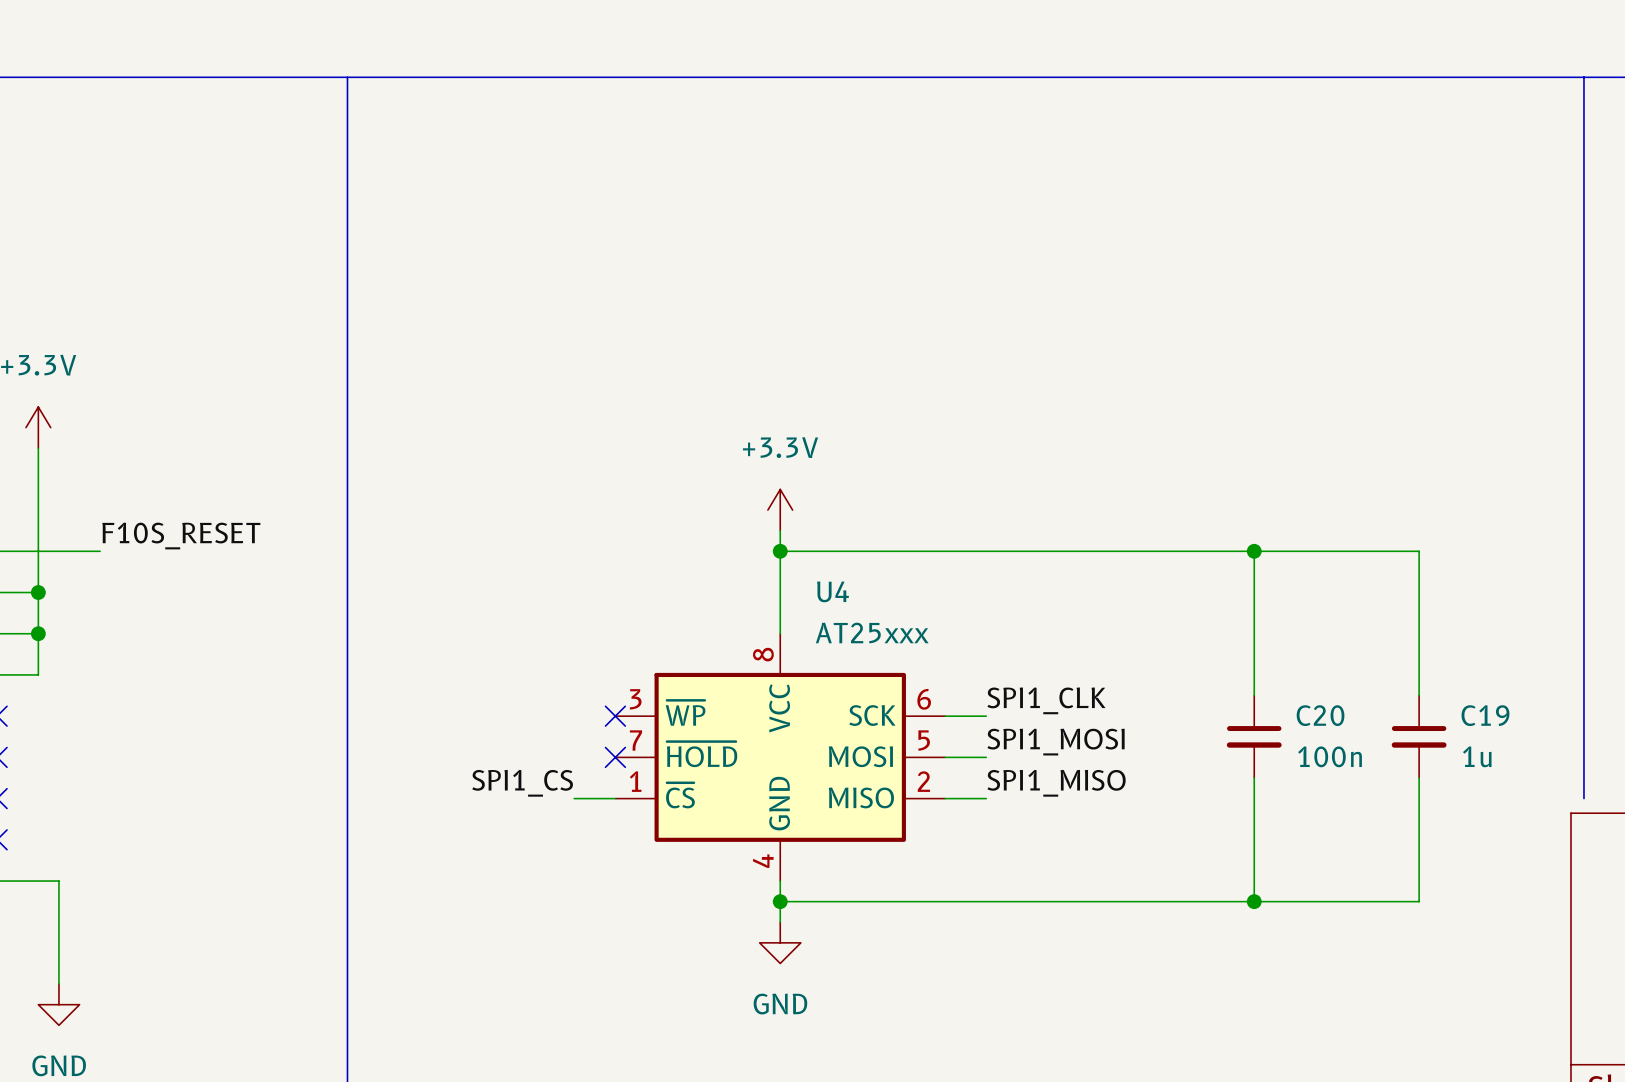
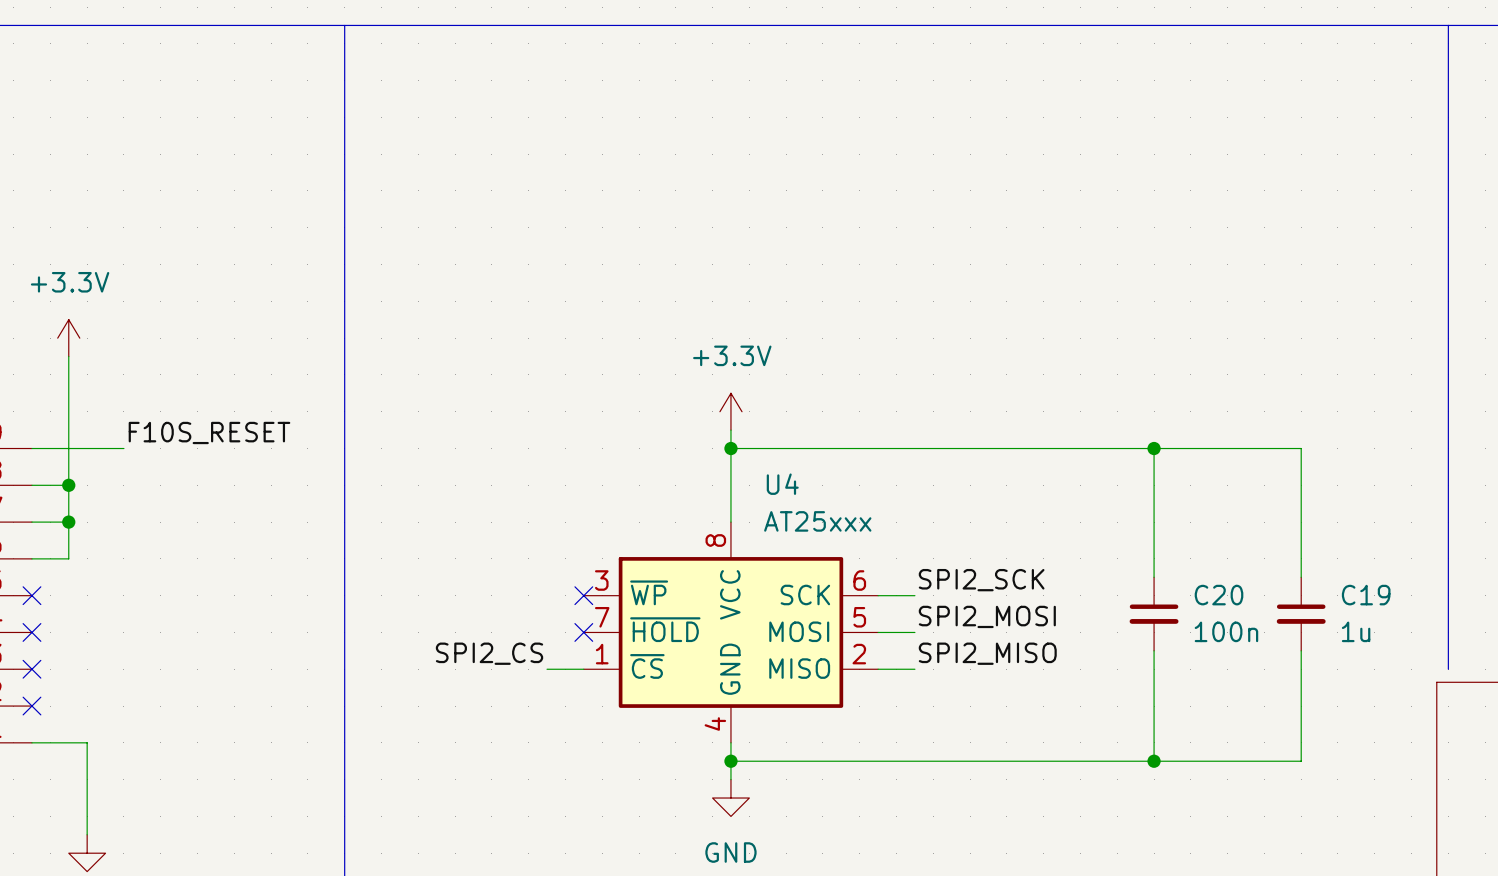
label: SPI1_CLK (1046, 700) -> SPI2_SCK (981, 580)
label: SPI1_MOSI (1056, 742) -> SPI2_MOSI (987, 616)
label: SPI1_CS (522, 783) -> SPI2_CS (489, 653)
label: SPI1_MISO (1056, 783) -> SPI2_MISO (987, 653)

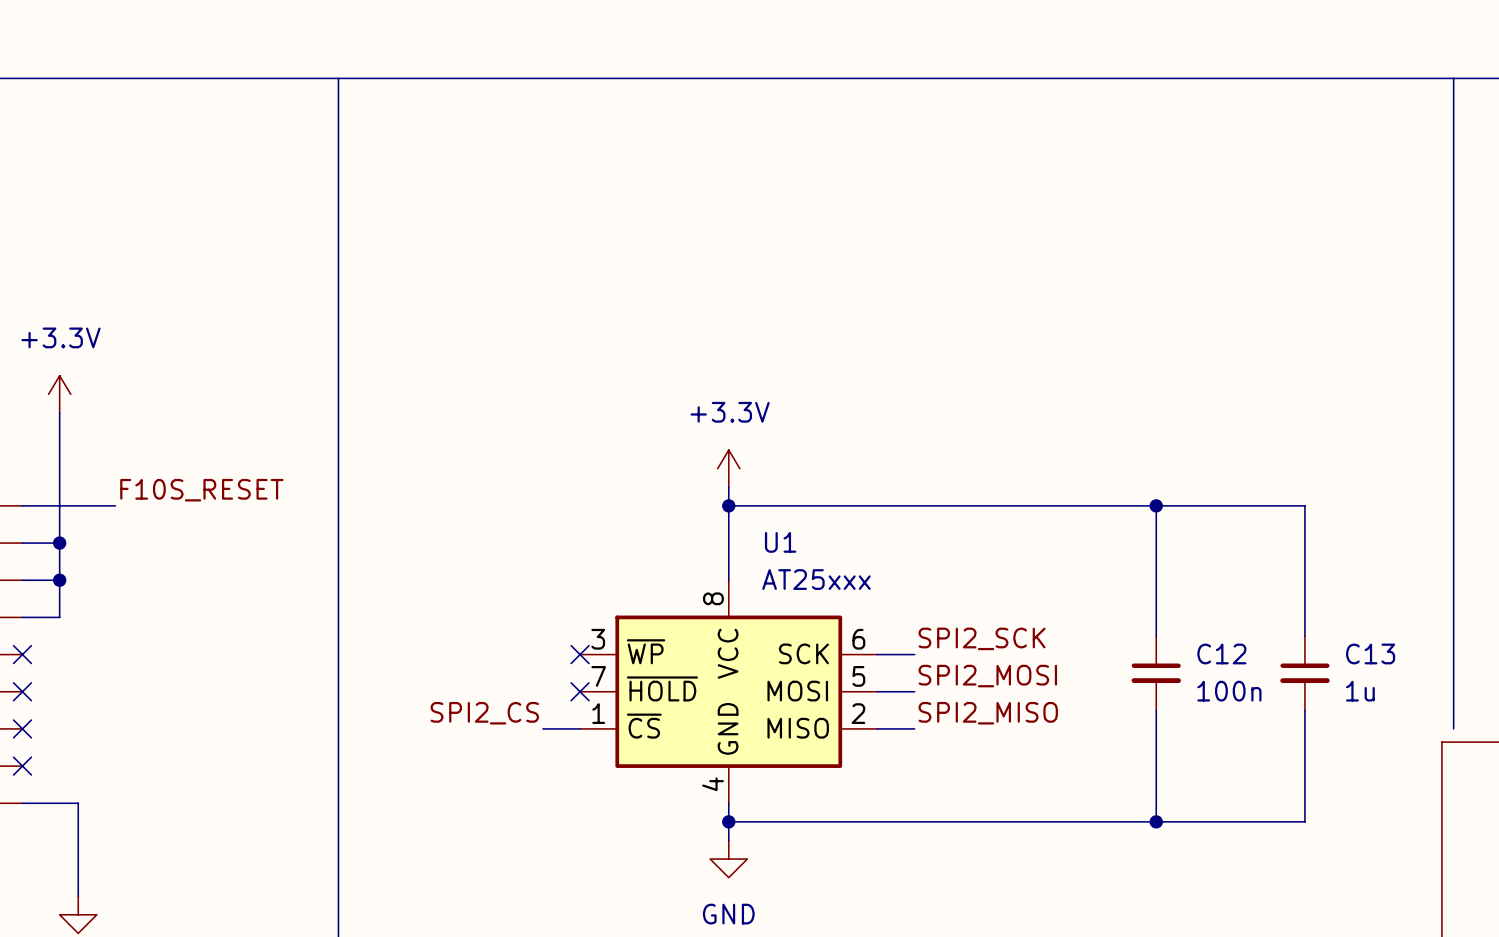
U4 name: U4 (782, 484) -> U1 (780, 542)
C20 name: C20 (1219, 595) -> C12 (1221, 653)
C19 name: C19 (1366, 595) -> C13 (1370, 653)

